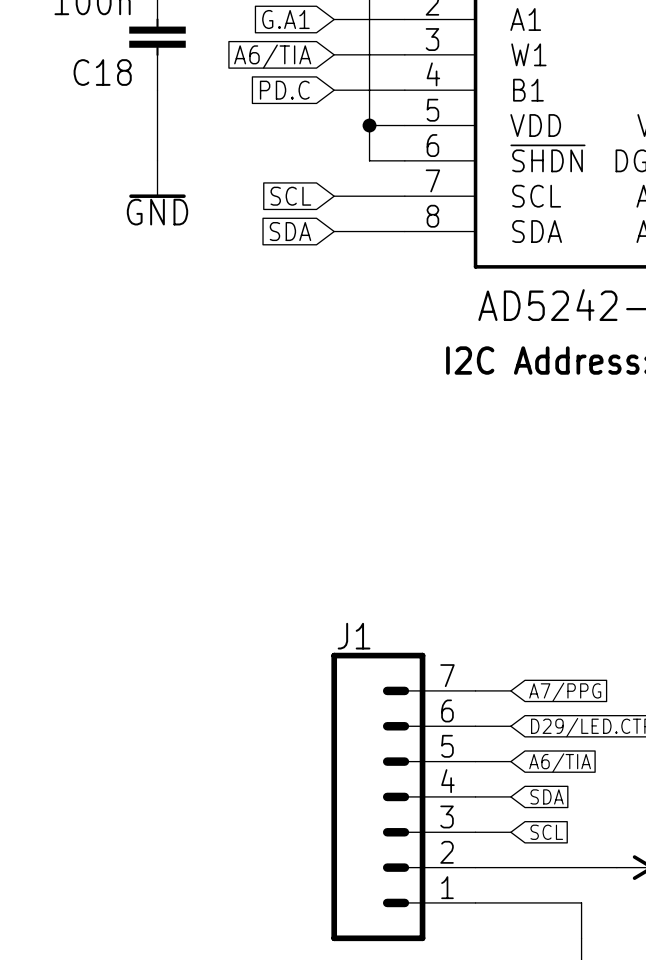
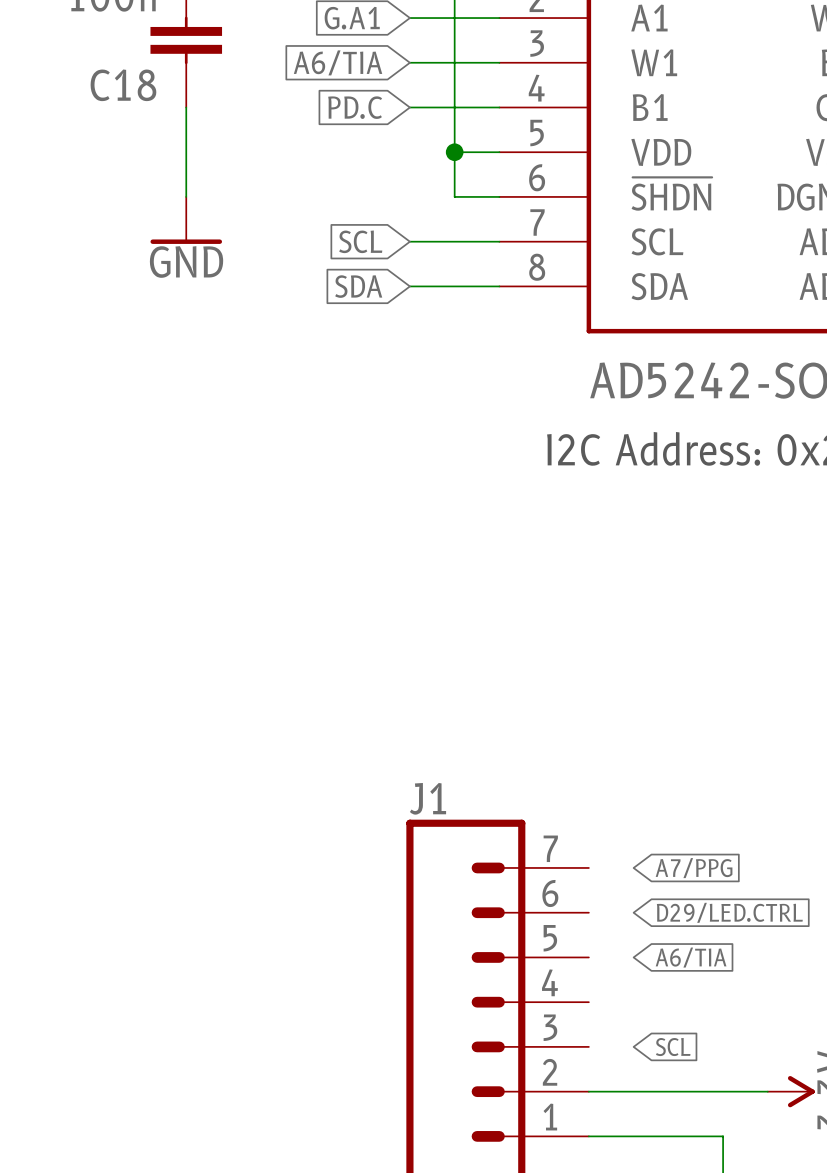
wire: (475, 690) (510, 690) -> none
wire: (475, 726) (510, 726) -> none
wire: (475, 761) (510, 761) -> none
wire: (475, 796) (510, 796) -> none
global label: SDA (547, 796) -> none
wire: (475, 832) (510, 832) -> none

